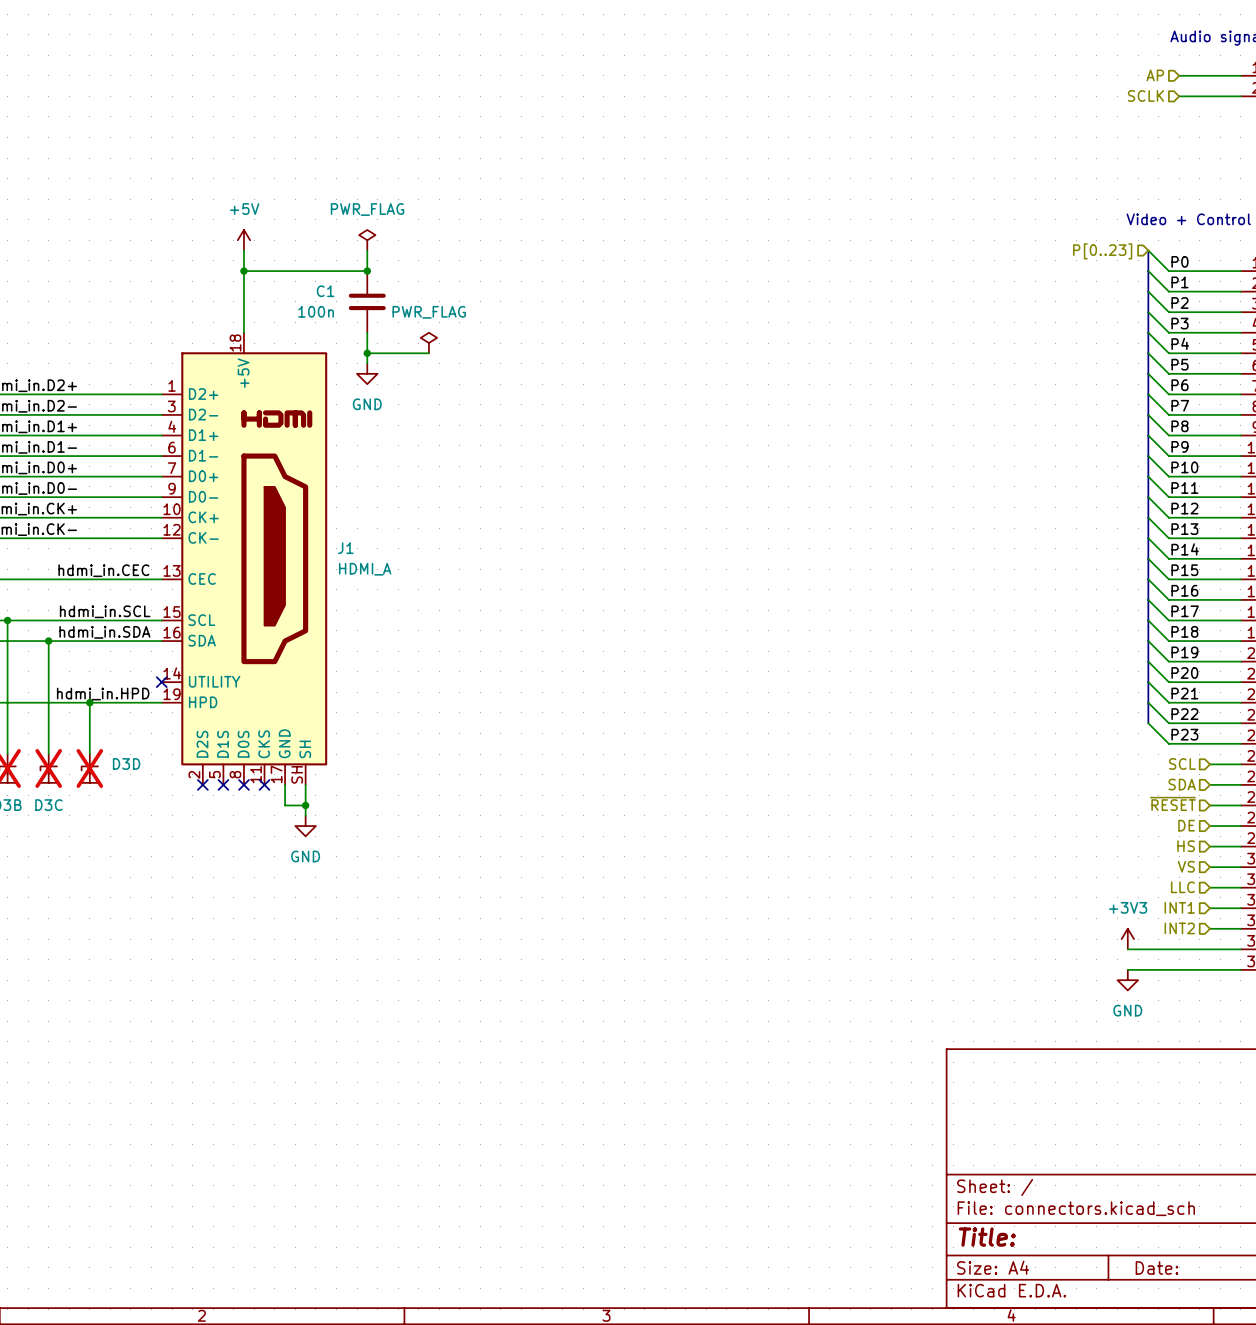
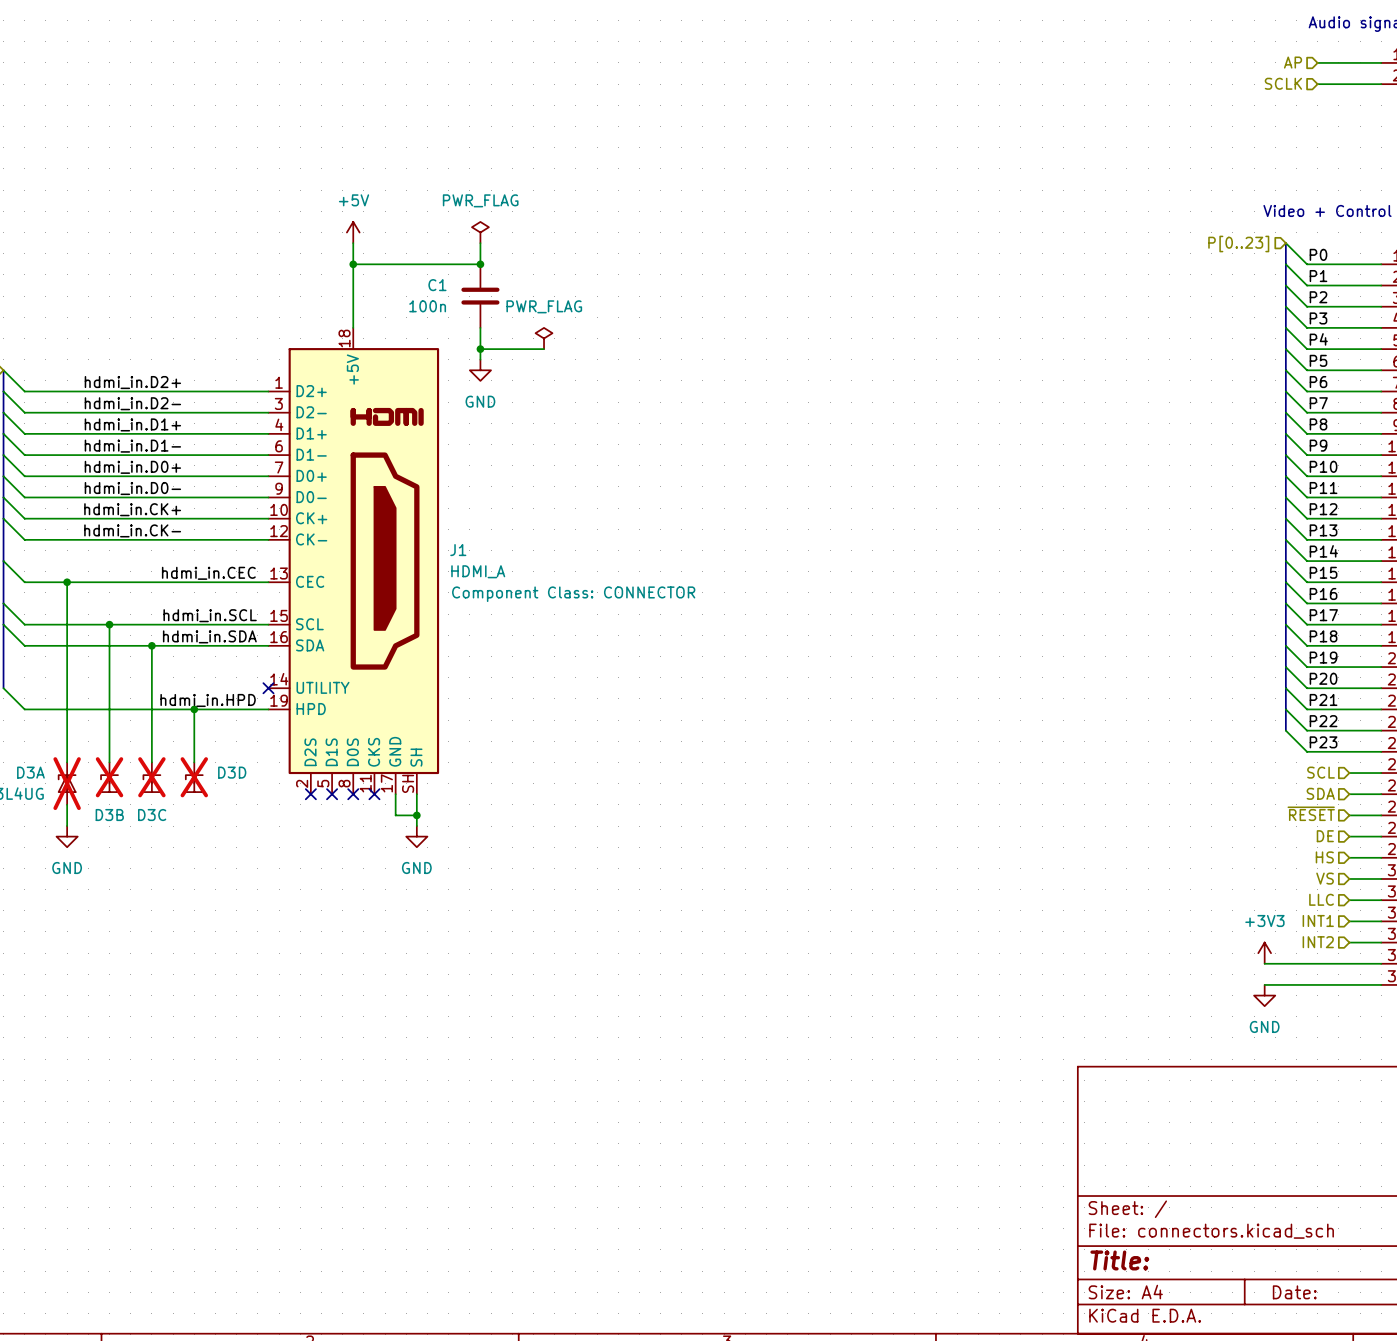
J1 text: none -> Component Class: CONNECTOR (573, 594)

